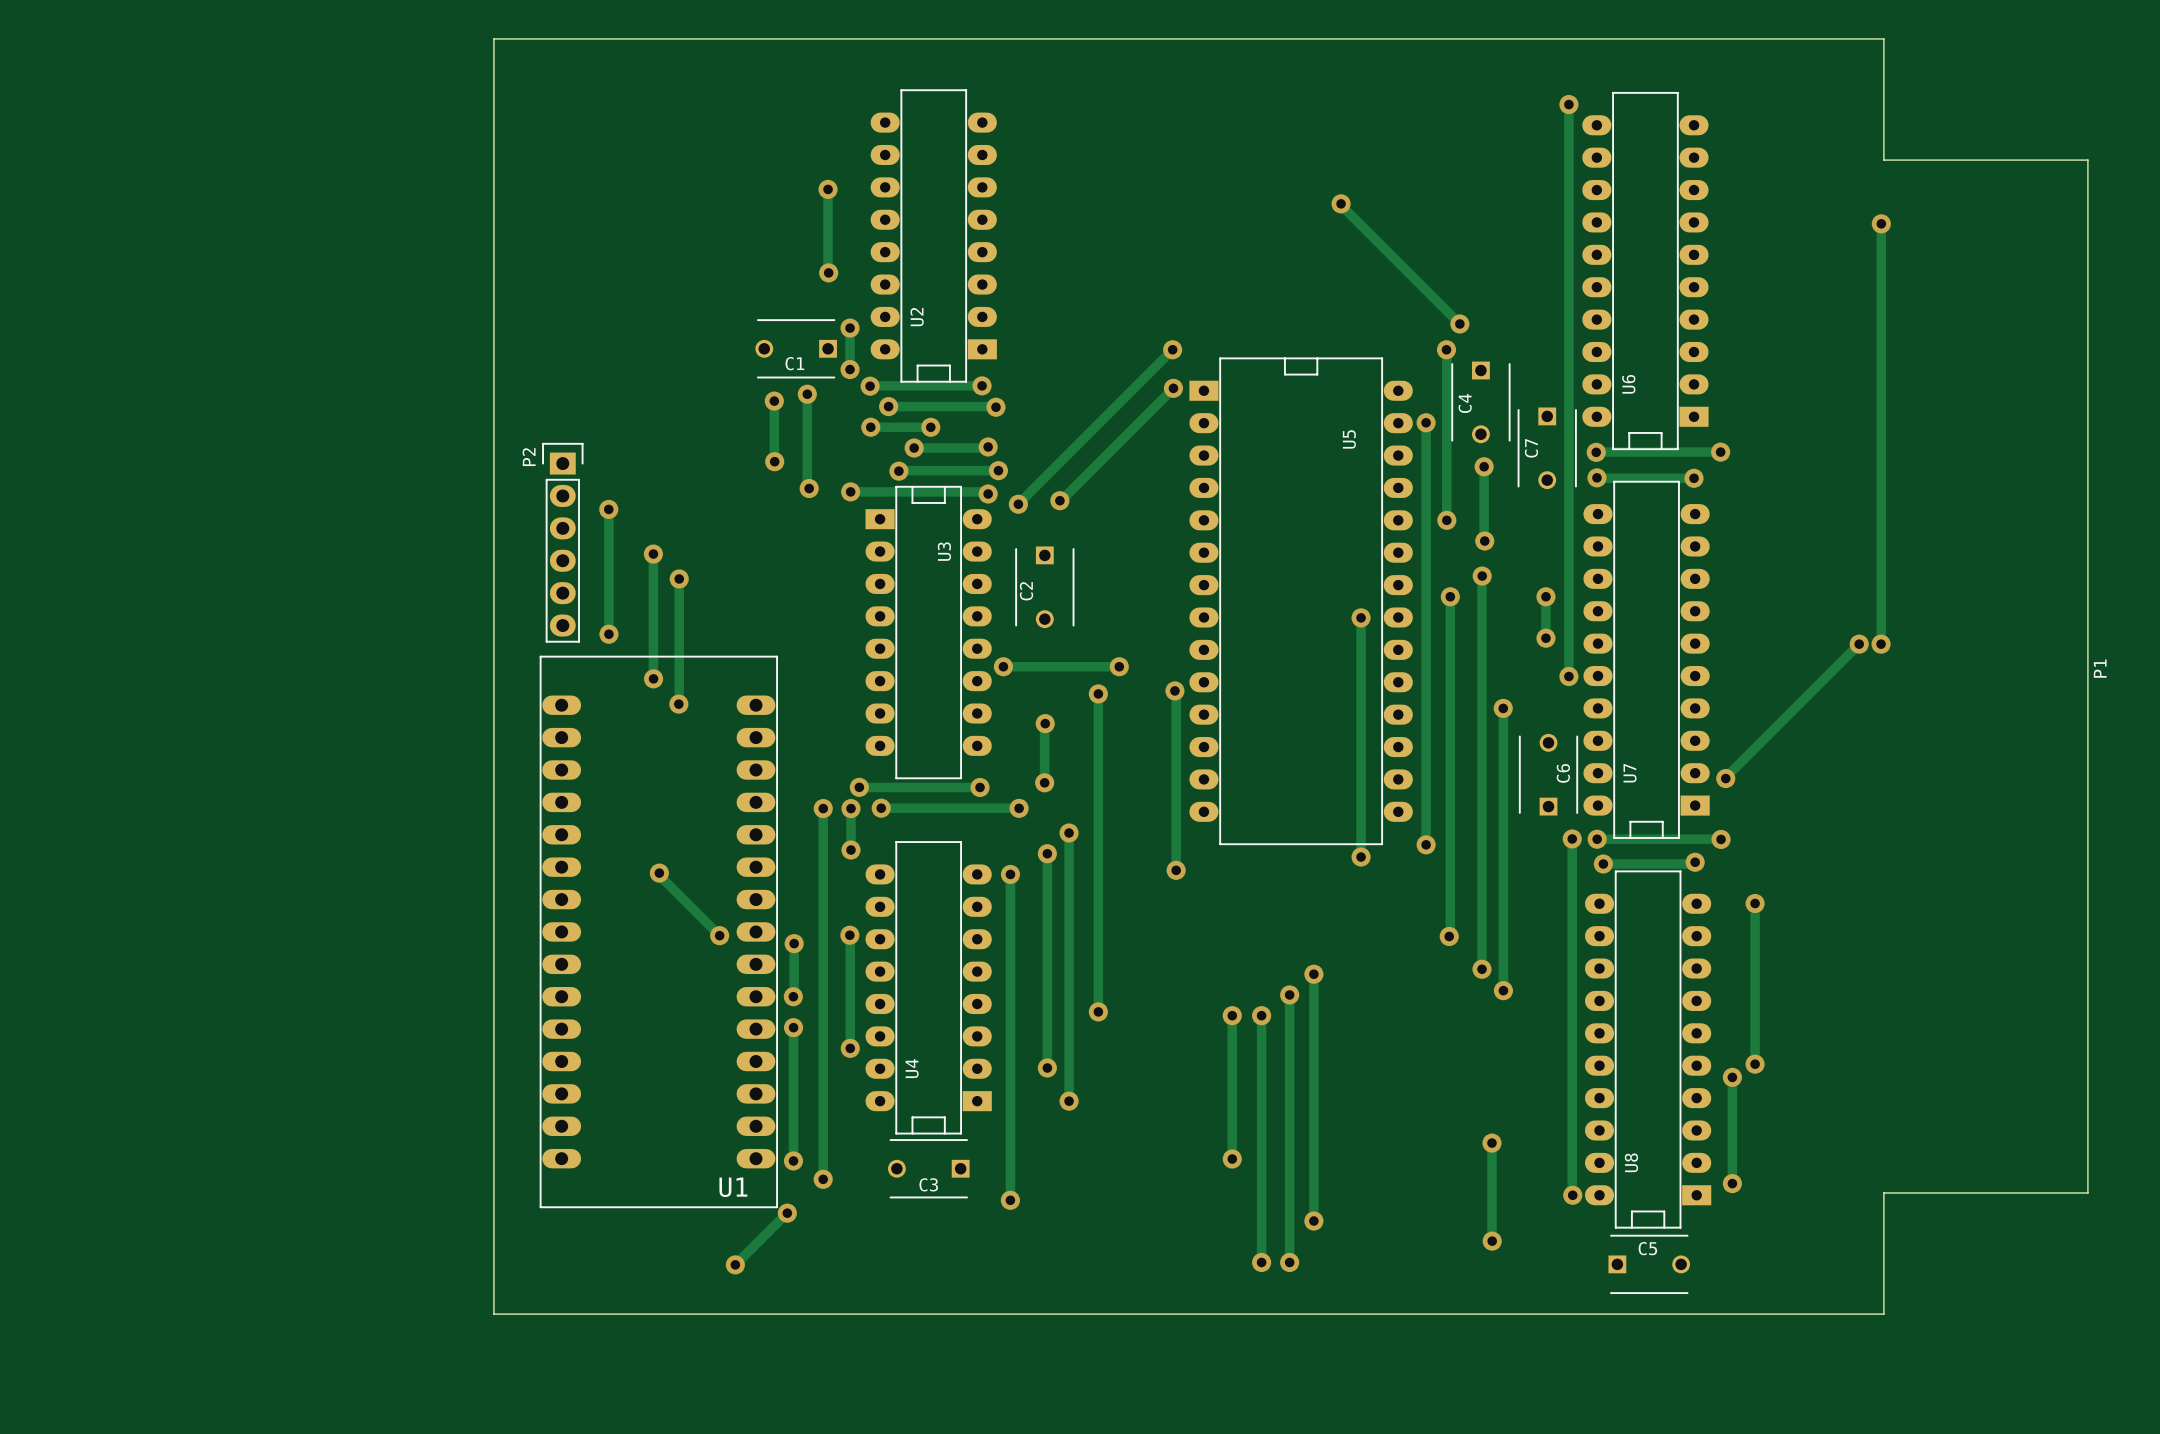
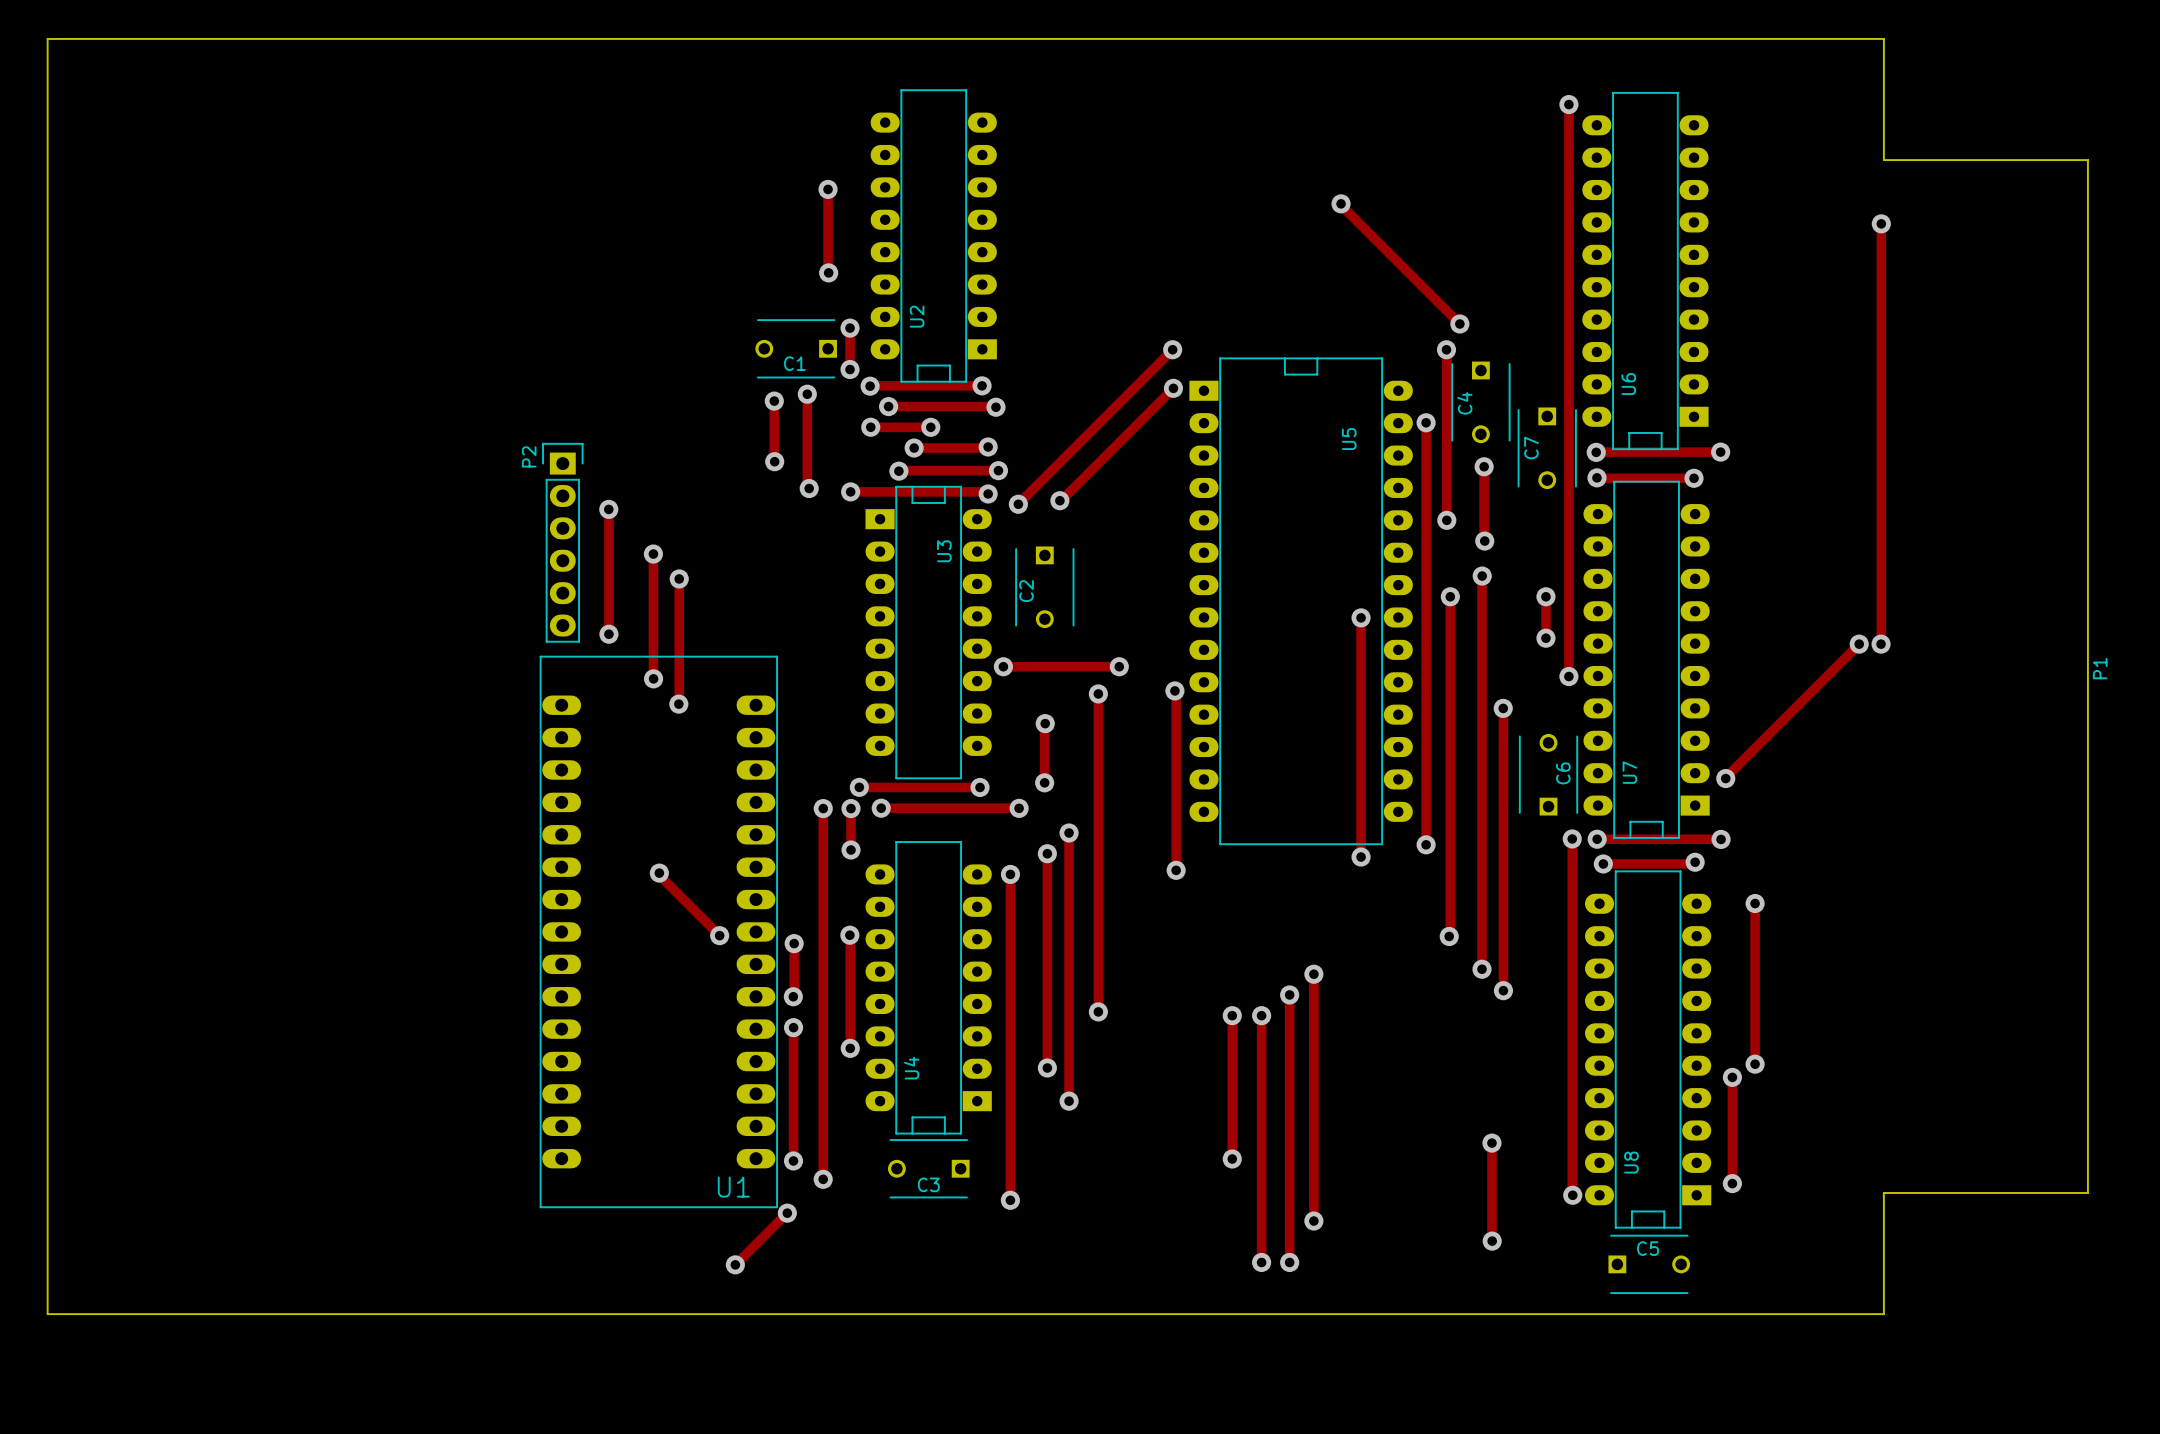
board edge: (493, 38) (493, 1314) -> (493, 38) (47, 38) (47, 1314) (493, 1314)

